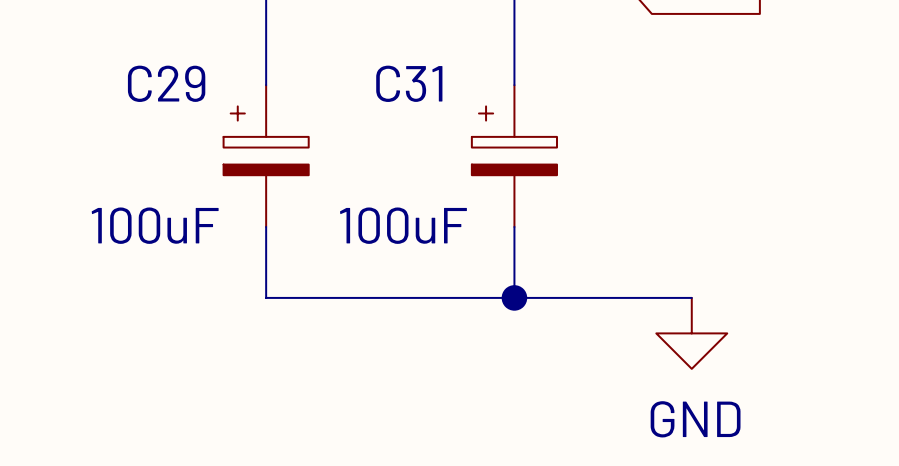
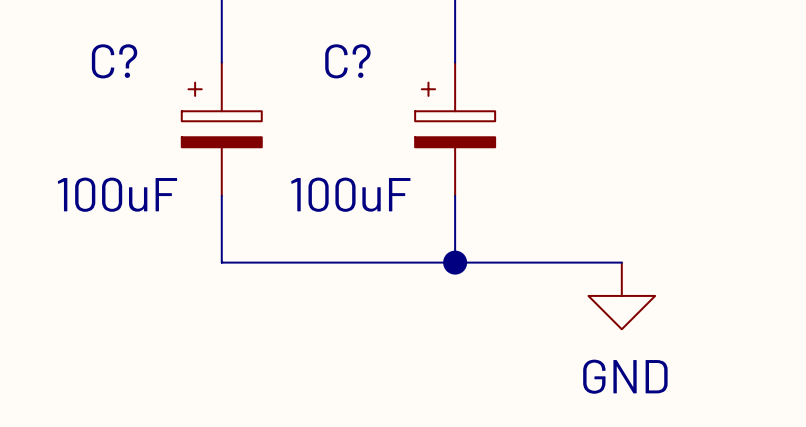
C29 name: C29 (166, 83) -> C? (114, 61)
C31 name: C31 (409, 83) -> C? (347, 61)

